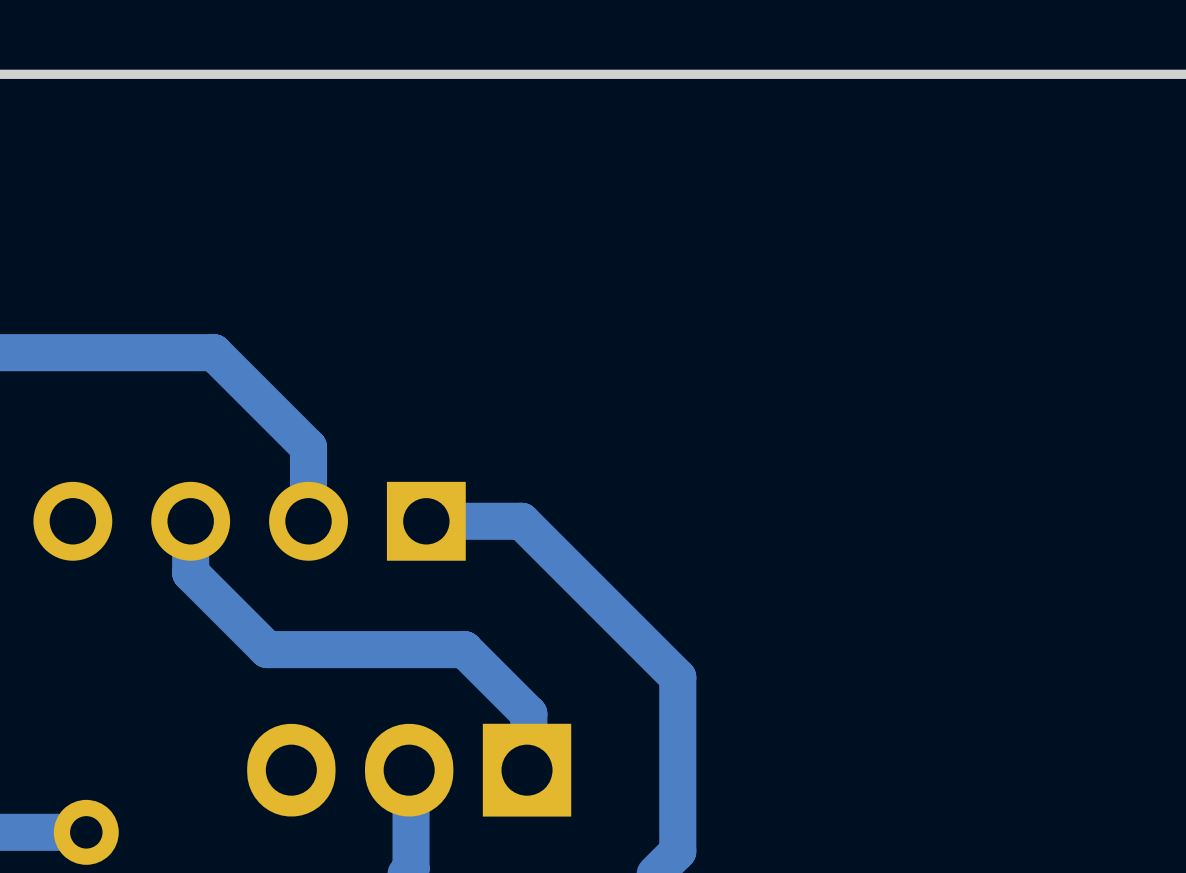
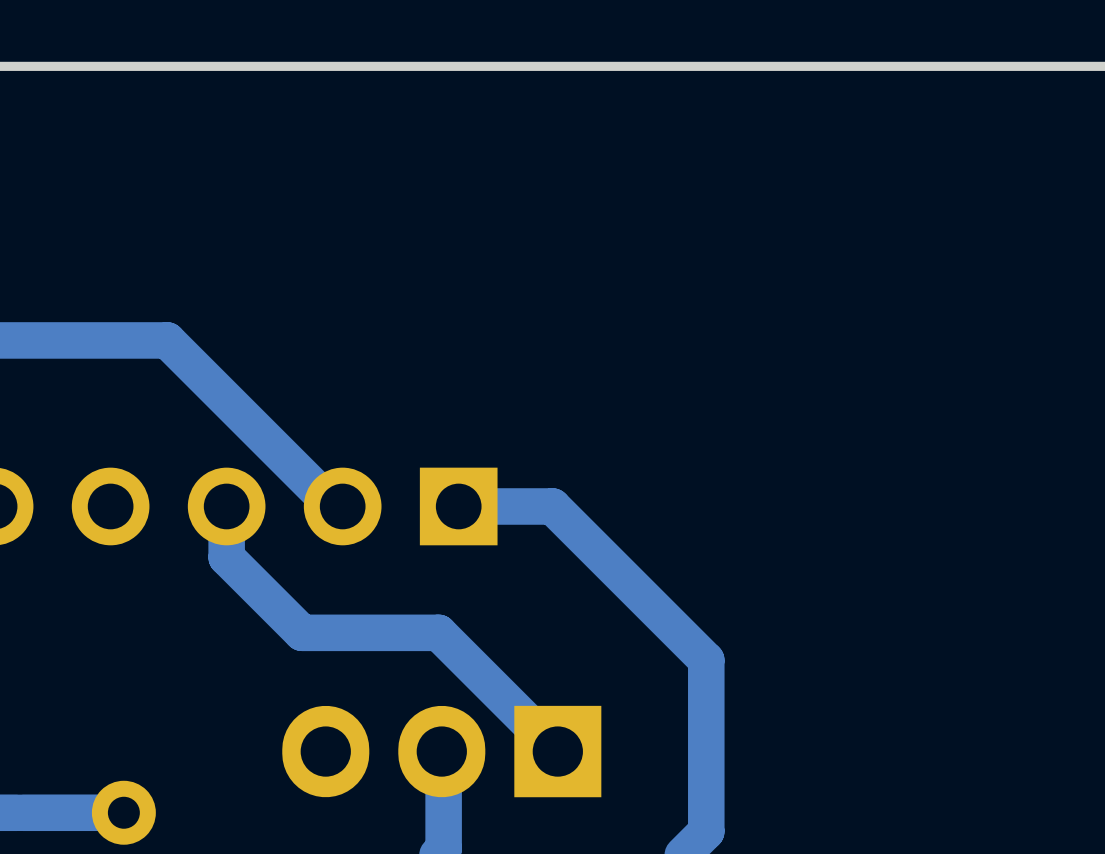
track: (130, 352) (213, 352) (308, 447) (308, 521) -> (167, 340) (333, 506) (342, 506)
track: (405, 649) (464, 649) (528, 714) (528, 772) -> (438, 632) (559, 753)

